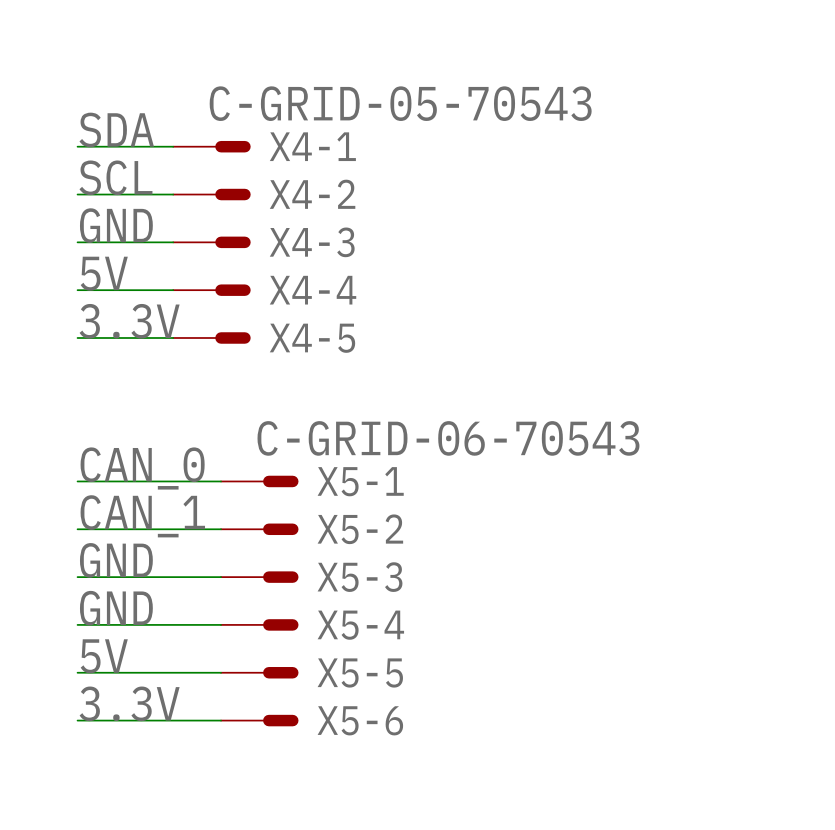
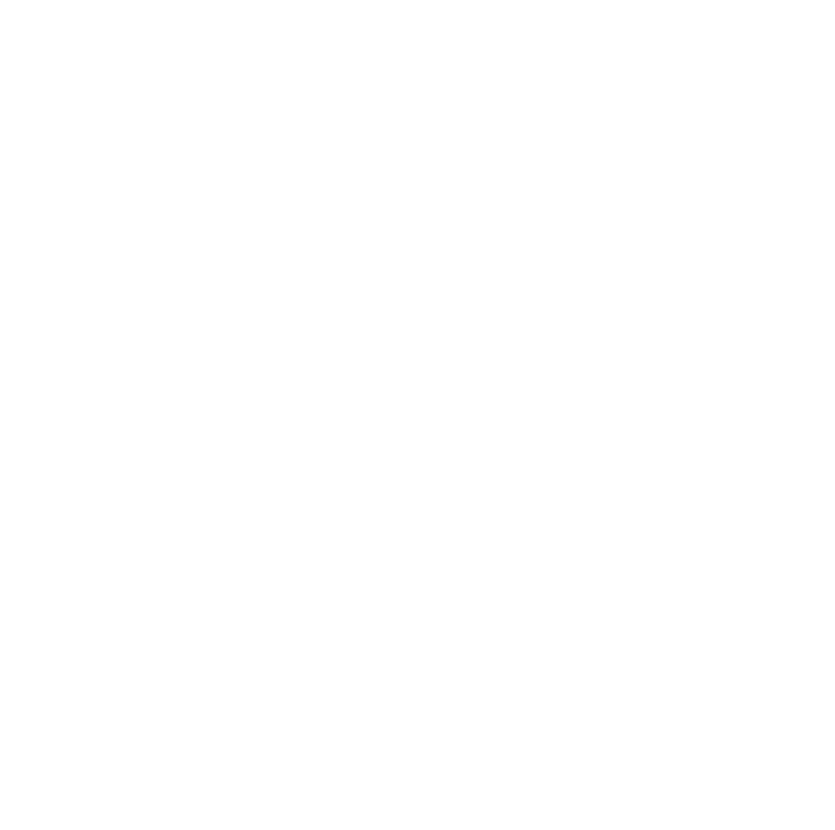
label: SDA (116, 129) -> none
wire: (77, 146) (173, 146) -> none
X4-1: C-GRID-05-70543 (211, 146) -> none
label: SCL (115, 177) -> none
wire: (77, 194) (173, 194) -> none
X4-2: (211, 194) -> none
label: GND (116, 225) -> none
wire: (77, 242) (173, 242) -> none
X4-3: (211, 242) -> none
label: 5V (104, 273) -> none
wire: (77, 290) (173, 290) -> none
X4-4: (211, 290) -> none
label: 3.3V (129, 321) -> none
wire: (77, 337) (173, 337) -> none
X4-5: (211, 337) -> none
label: CAN_0 (142, 468) -> none
wire: (77, 481) (221, 481) -> none
X5-1: C-GRID-06-70543 (259, 481) -> none
label: CAN_1 (142, 516) -> none
wire: (77, 529) (221, 529) -> none
X5-2: (259, 529) -> none
label: GND (116, 560) -> none
wire: (77, 577) (221, 577) -> none
X5-3: (259, 577) -> none
label: GND (116, 608) -> none
wire: (77, 624) (221, 624) -> none
X5-4: (259, 624) -> none
label: 5V (104, 656) -> none
wire: (77, 672) (221, 672) -> none
X5-5: (259, 672) -> none
label: 3.3V (129, 703) -> none
wire: (77, 720) (221, 720) -> none
X5-6: (259, 720) -> none

